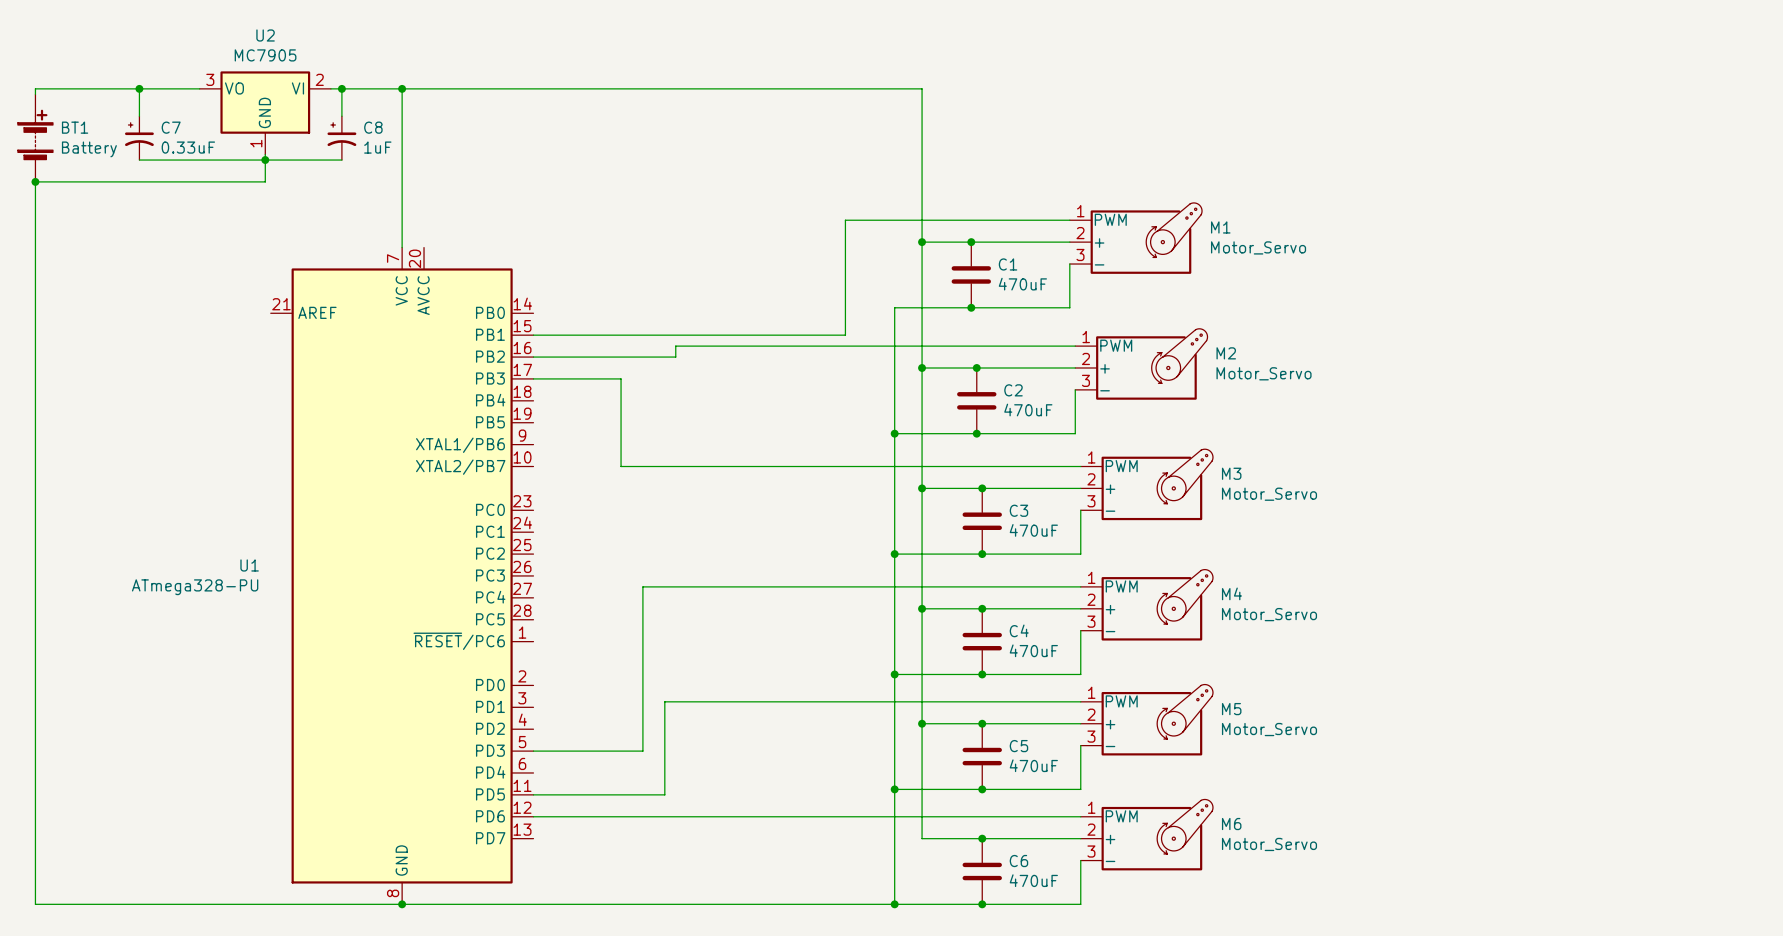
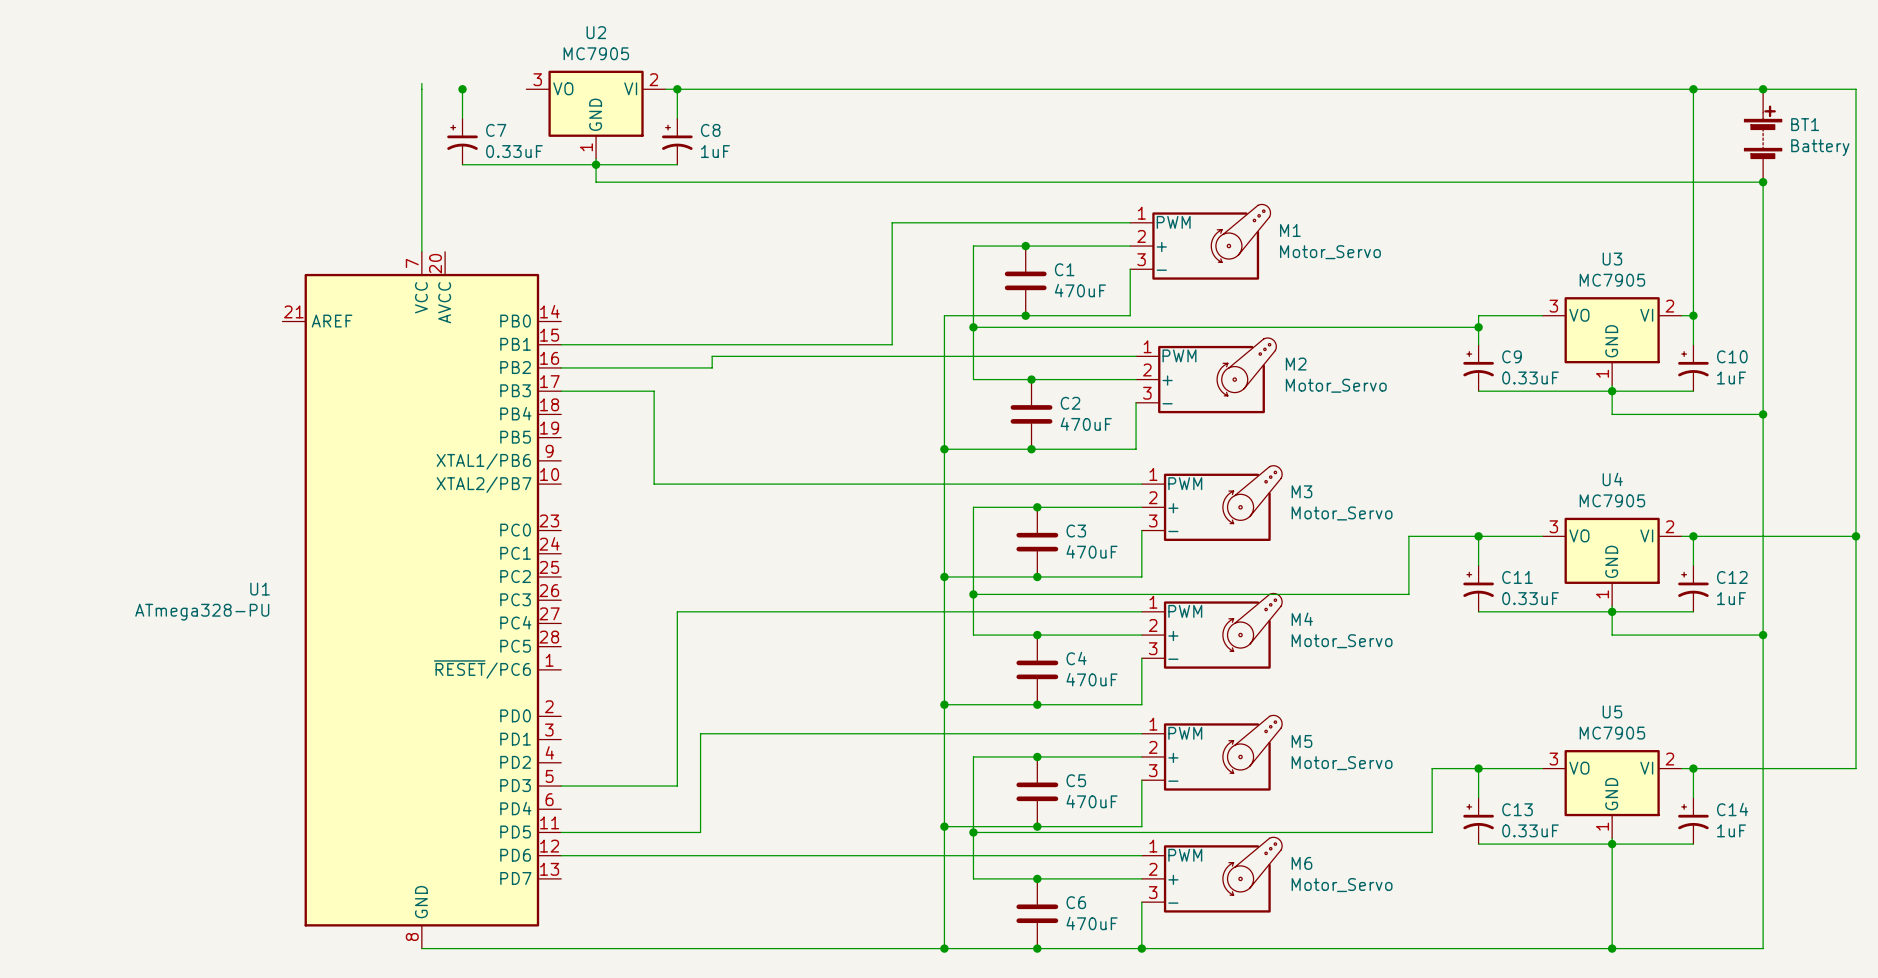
wire: (139, 88) (139, 116) -> none
junction: (139, 88) -> none
wire: (199, 88) (35, 88) (35, 94) -> none
wire: (330, 88) (922, 88) (922, 242) -> none
wire: (341, 88) (341, 116) -> (462, 89) (462, 118)
junction: (341, 88) -> none
junction position: (402, 88) -> (462, 89)
wire: none -> (665, 89) (1856, 89) (1856, 768) (1681, 768)
wire: none -> (677, 89) (677, 118)
junction: none -> (677, 89)
wire: none -> (1693, 89) (1693, 344)
junction: none -> (1693, 89)
junction: none -> (1763, 89)
U2 position: (265, 112) -> (596, 114)
BT1 position: (35, 138) -> (1763, 135)
C7 position: (139, 138) -> (462, 141)
C8 position: (341, 138) -> (677, 141)
wire: (265, 154) (265, 181) (35, 181) (35, 904) (402, 904) -> none
wire: (139, 160) (341, 160) -> none
junction: (265, 160) -> none
wire: none -> (596, 158) (596, 182) (1763, 182) (1763, 948) (1141, 948)
wire: none -> (462, 164) (677, 164)
junction: none -> (596, 164)
junction: (35, 181) -> none
junction: none -> (1763, 182)
junction: (922, 242) -> none
wire: none -> (1542, 315) (1478, 315) (1478, 344)
wire: none -> (1681, 315) (1693, 315)
junction: none -> (1693, 315)
wire: none -> (973, 327) (1478, 327)
junction: none -> (973, 327)
junction: none -> (1478, 327)
U3: none -> MC7905 (1612, 341)
C9: none -> 0.33uF (1478, 367)
C10: none -> 1uF (1693, 367)
wire: (922, 367) (922, 488) -> none
junction: (922, 367) -> none
wire: none -> (1612, 385) (1612, 414) (1763, 414)
wire: none -> (1478, 391) (1693, 391)
junction: none -> (1612, 391)
junction: none -> (1763, 414)
junction: (922, 488) -> none
wire: none -> (1478, 536) (1478, 565)
junction: none -> (1478, 536)
wire: none -> (1542, 536) (1408, 536) (1408, 594) (973, 594)
wire: none -> (1681, 536) (1856, 536)
wire: none -> (1693, 536) (1693, 565)
junction: none -> (1693, 536)
junction: none -> (1856, 536)
U4: none -> MC7905 (1612, 561)
C11: none -> 0.33uF (1478, 588)
C12: none -> 1uF (1693, 588)
wire: none -> (1612, 606) (1612, 635) (1763, 635)
wire: none -> (1478, 611) (1693, 611)
junction: none -> (1612, 611)
wire: (922, 608) (922, 723) -> none
junction position: (922, 608) -> (973, 594)
junction: none -> (1763, 635)
junction: (922, 723) -> none
wire: none -> (1478, 768) (1478, 797)
junction: none -> (1478, 768)
wire: none -> (1542, 768) (1432, 768) (1432, 832) (973, 832)
wire: none -> (1693, 768) (1693, 797)
junction: none -> (1693, 768)
U5: none -> MC7905 (1612, 794)
C13: none -> 0.33uF (1478, 820)
C14: none -> 1uF (1693, 820)
junction: none -> (973, 832)
wire: none -> (1612, 838) (1612, 948)
wire: none -> (1478, 844) (1693, 844)
junction: none -> (1612, 844)
junction: (402, 904) -> none
junction: none -> (1141, 948)
junction: none -> (1612, 948)

